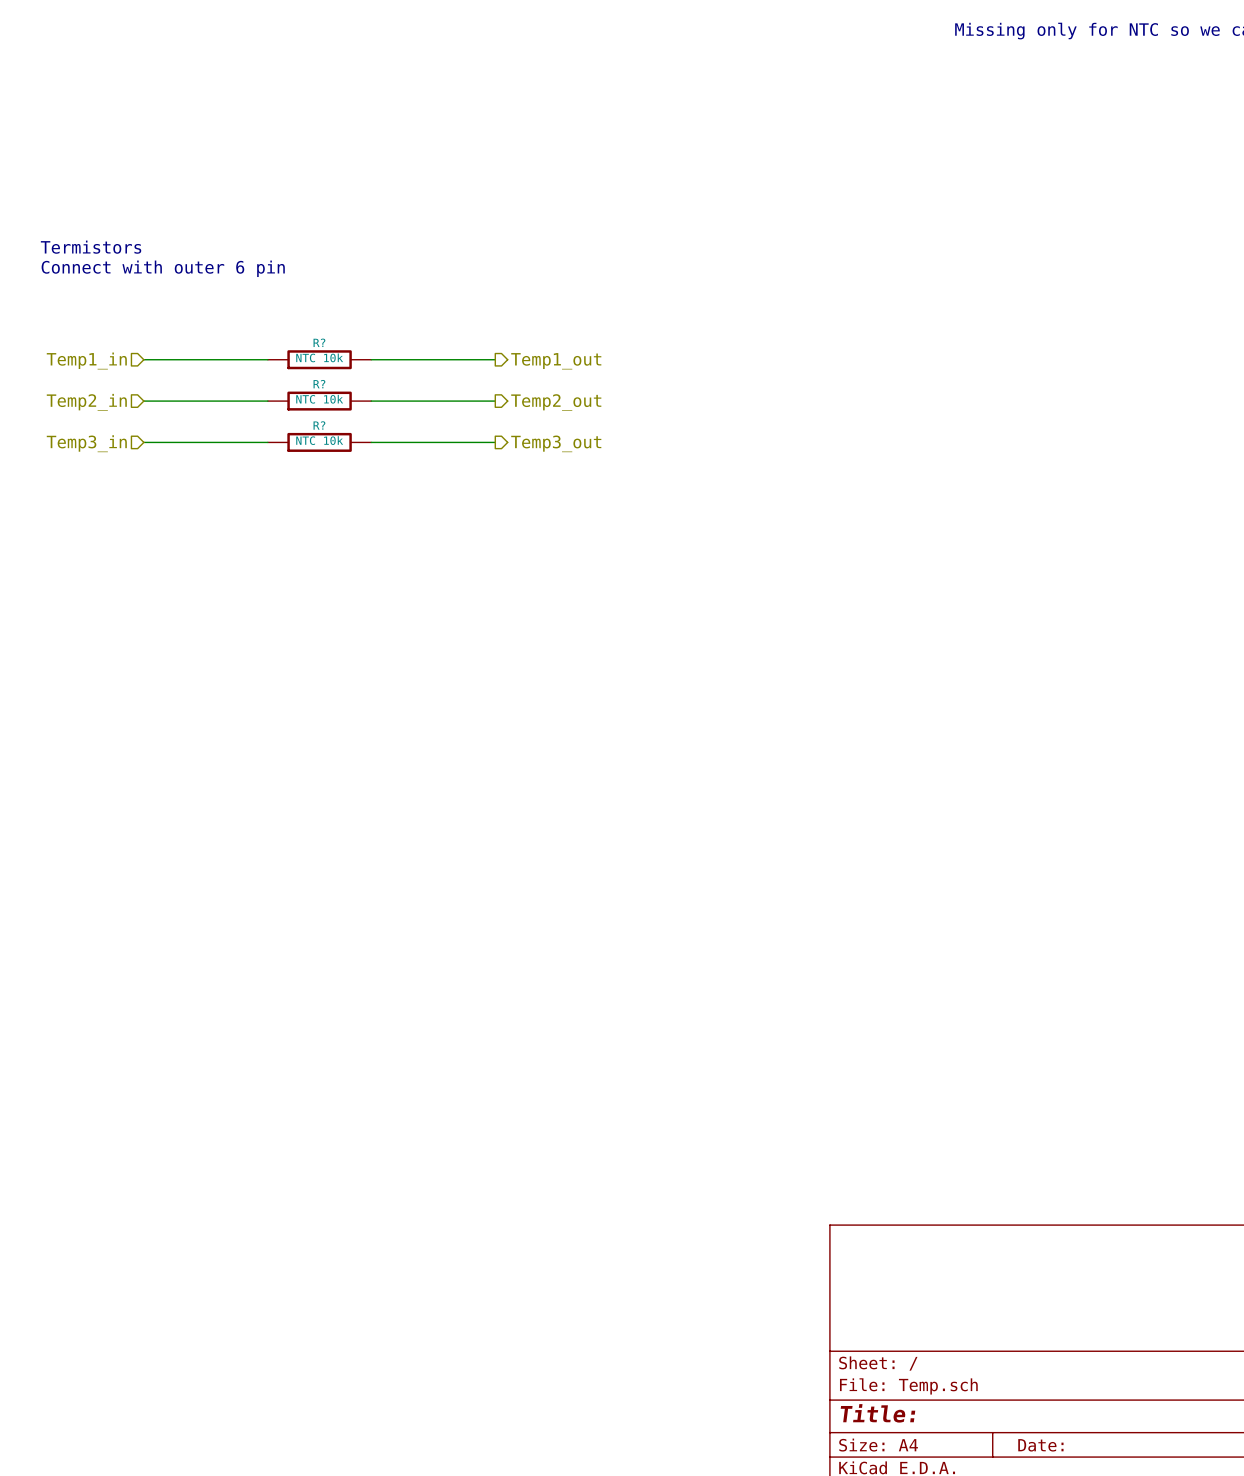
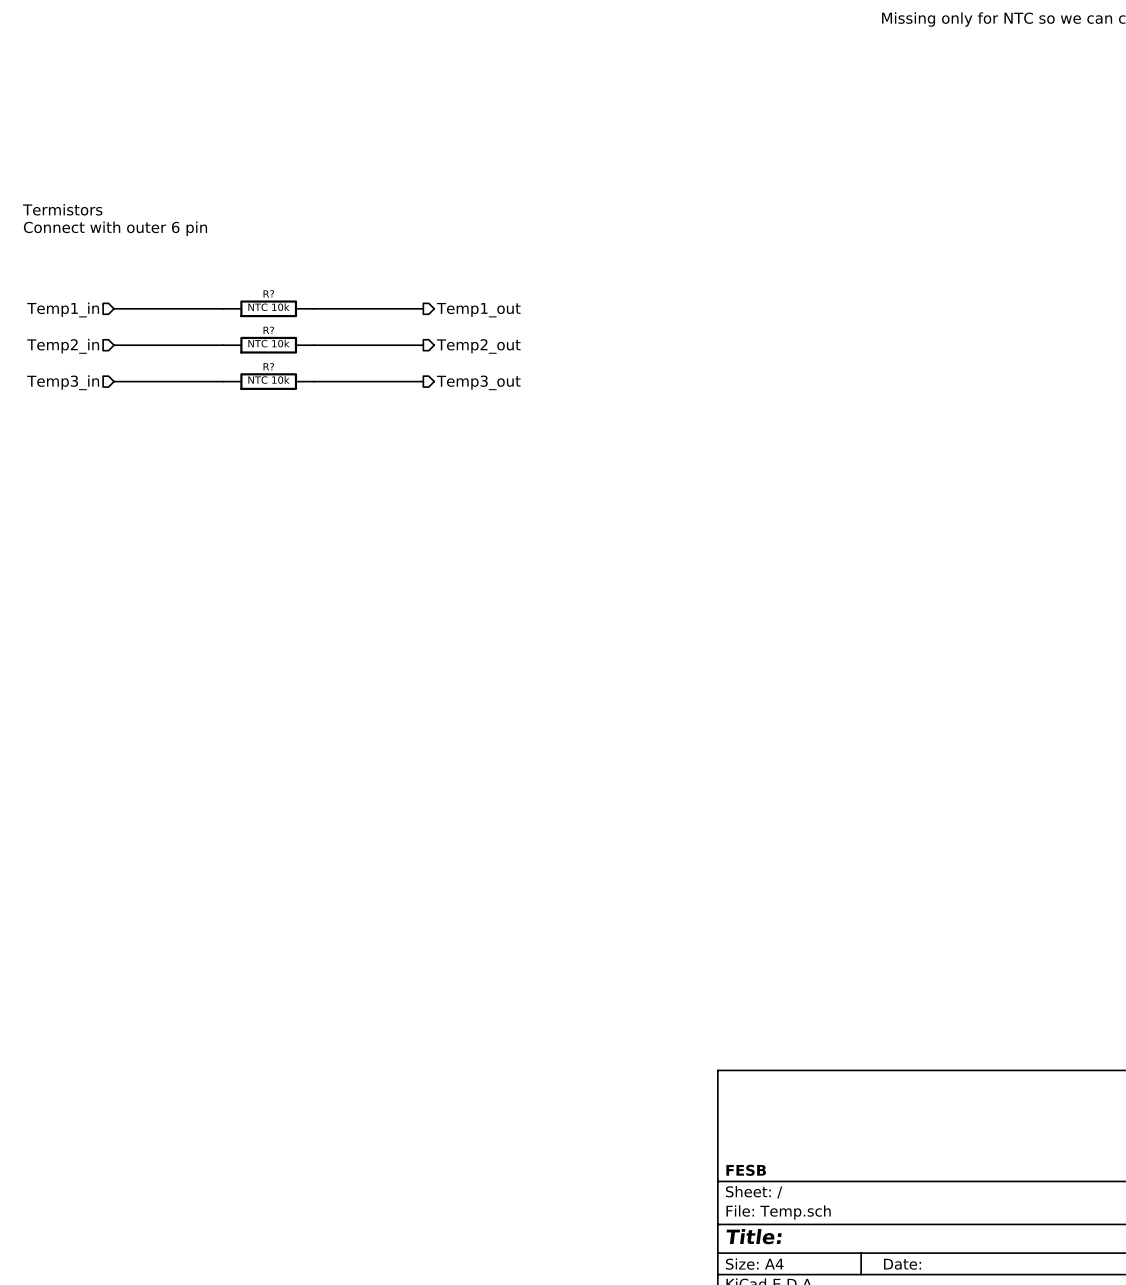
title block: none -> FESB (746, 1170)

